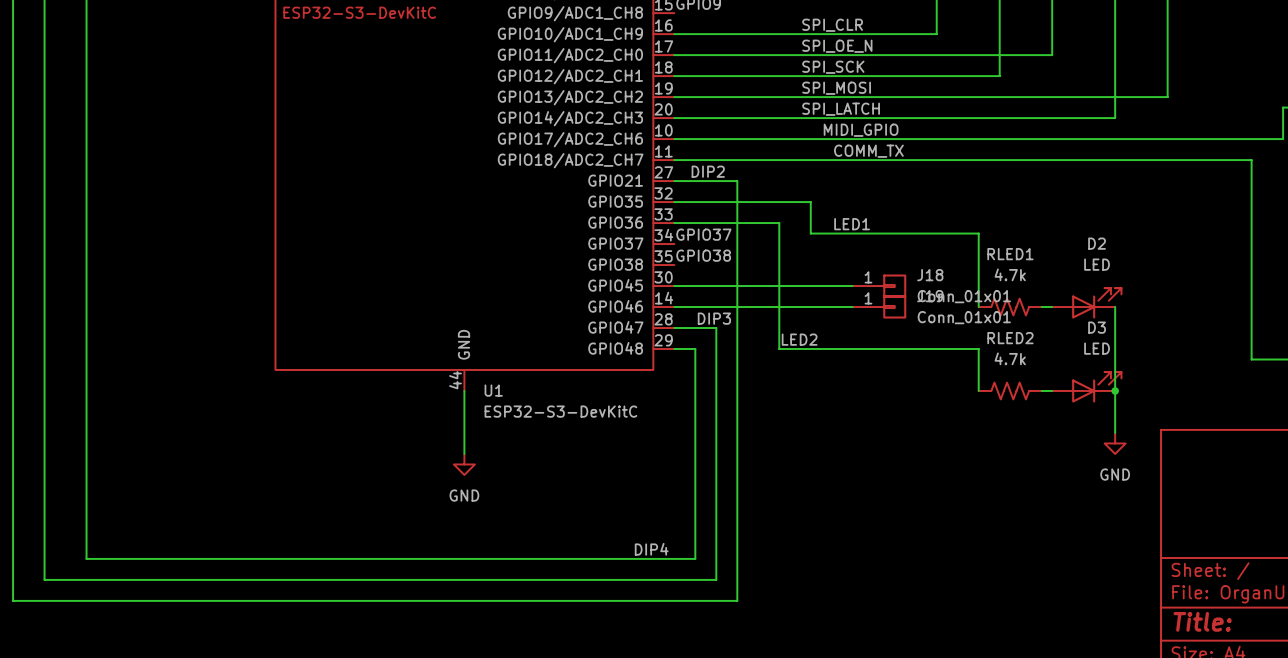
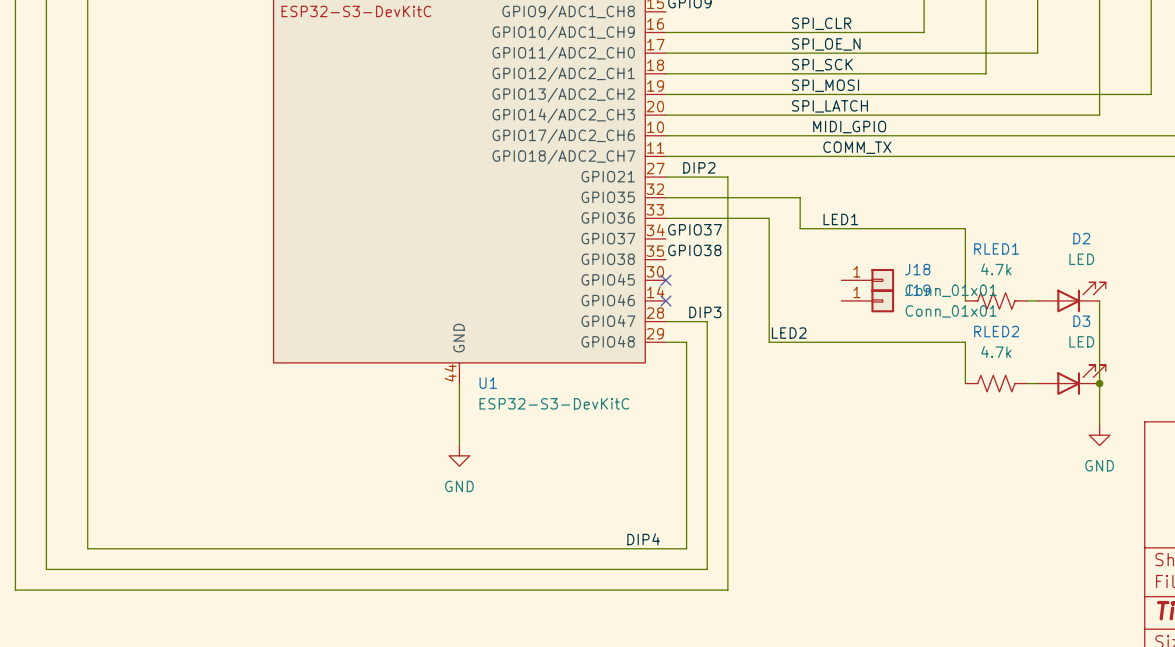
wire: (674, 286) (852, 286) -> none
no-connect mark: none -> (665, 280)
wire: (674, 307) (852, 307) -> none
no-connect mark: none -> (665, 300)

